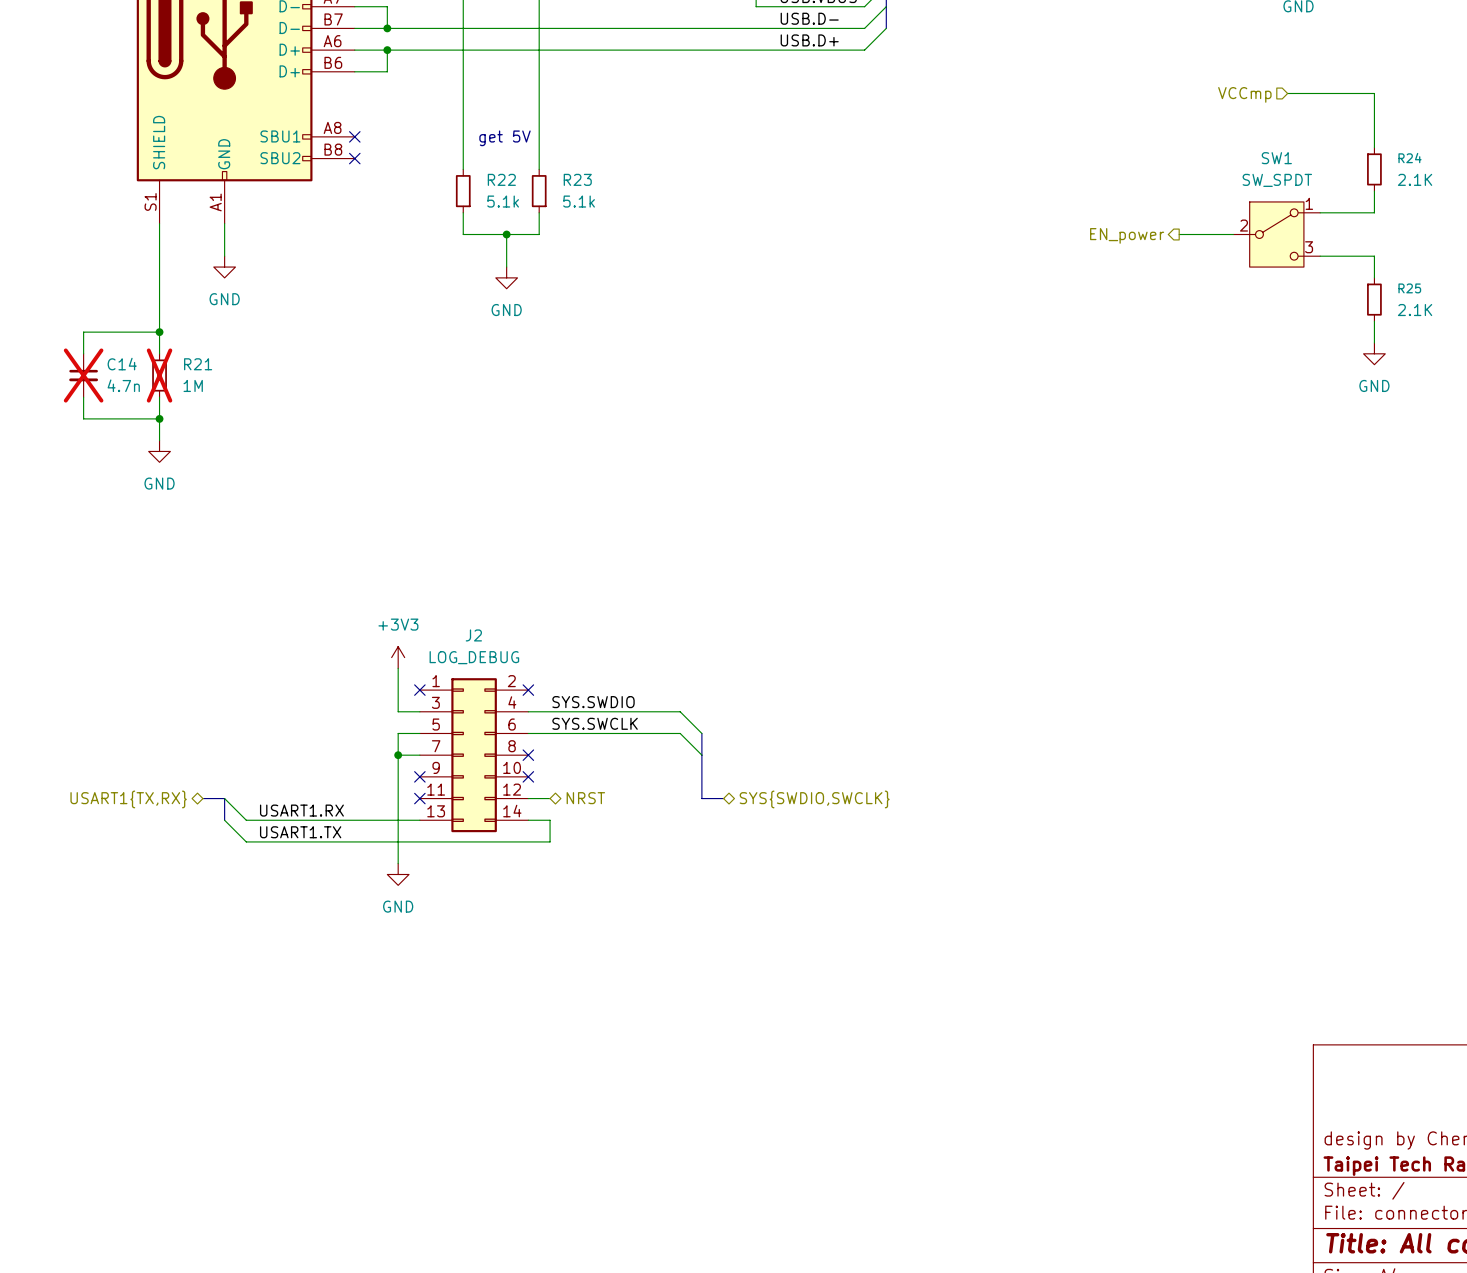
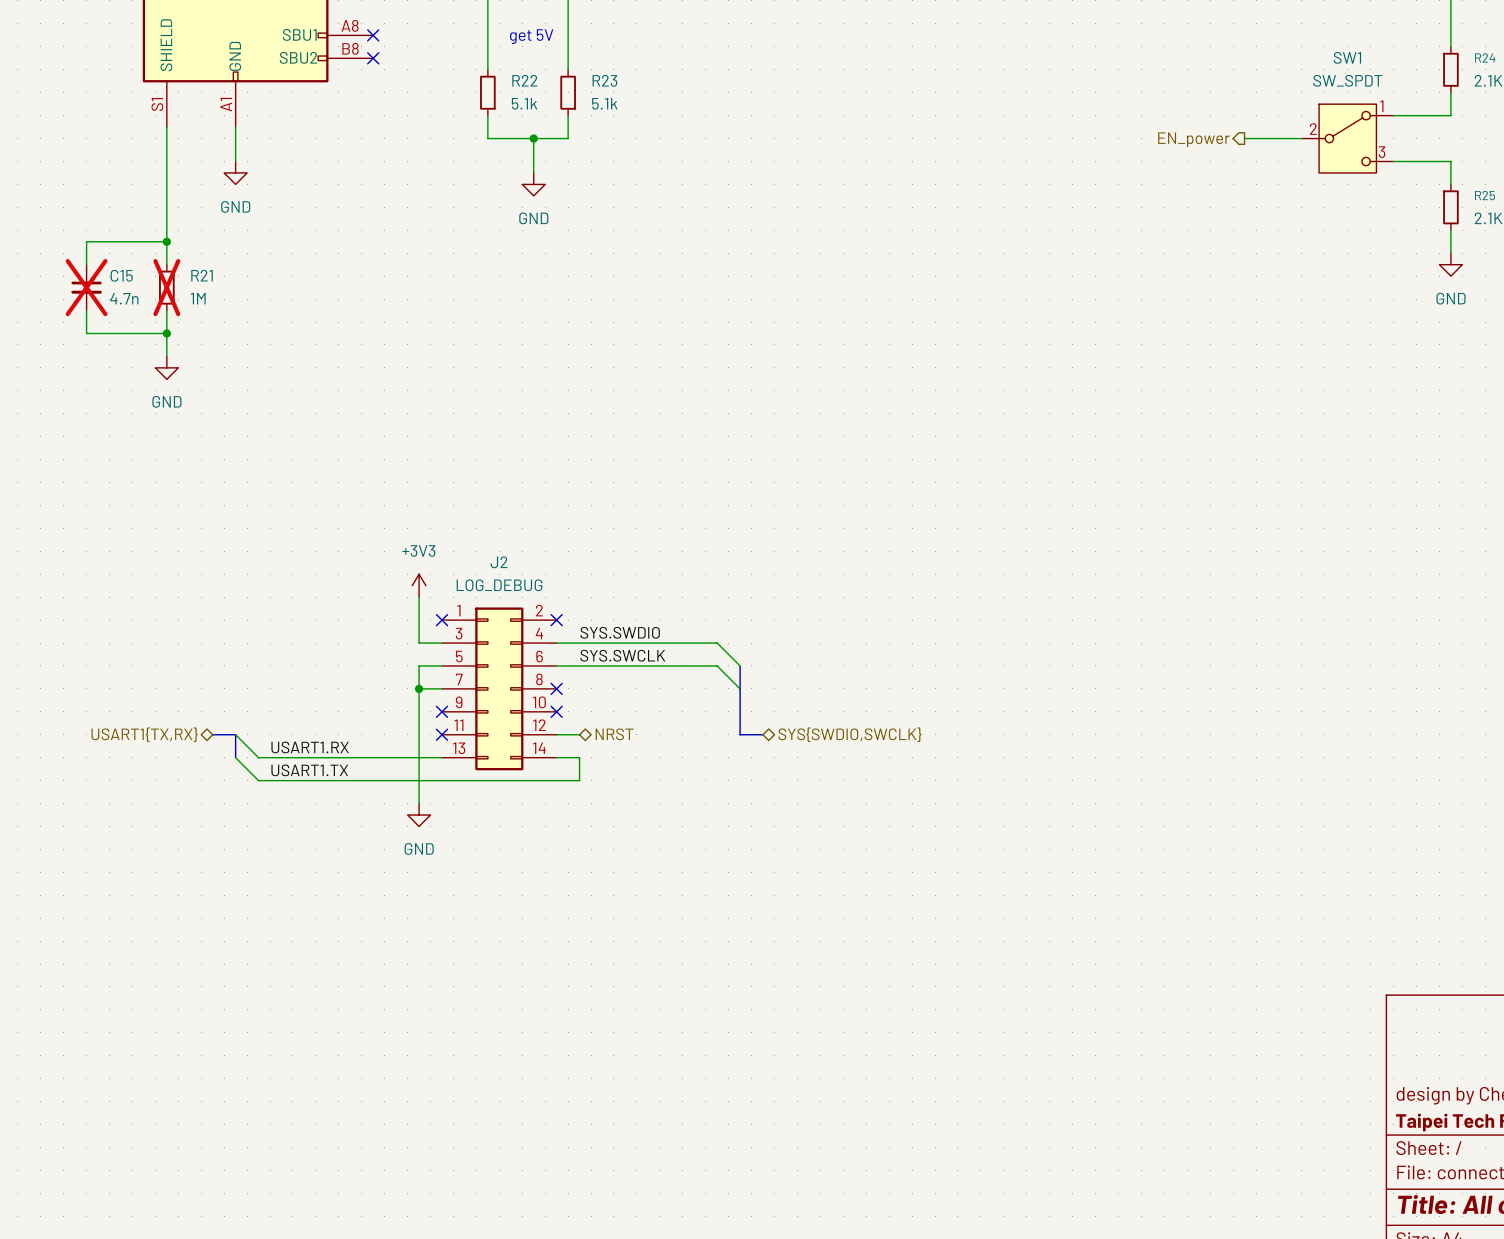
C14 name: C14 (122, 364) -> C15 (121, 275)

